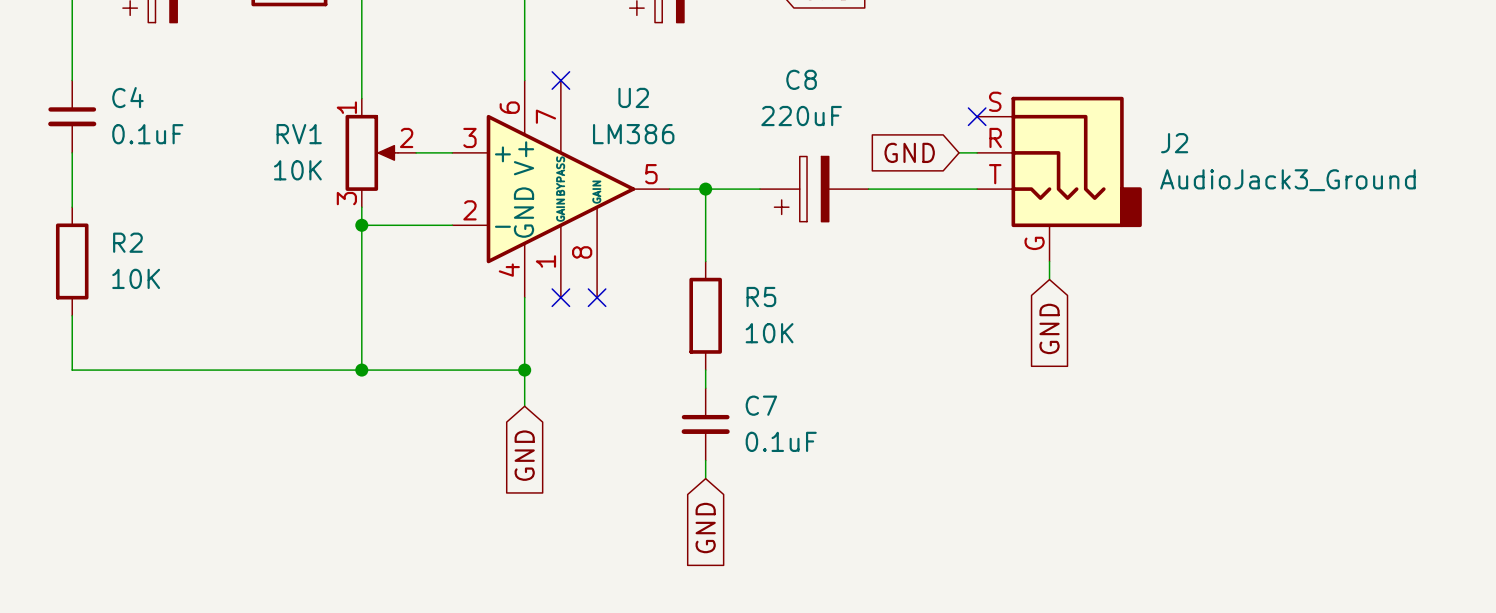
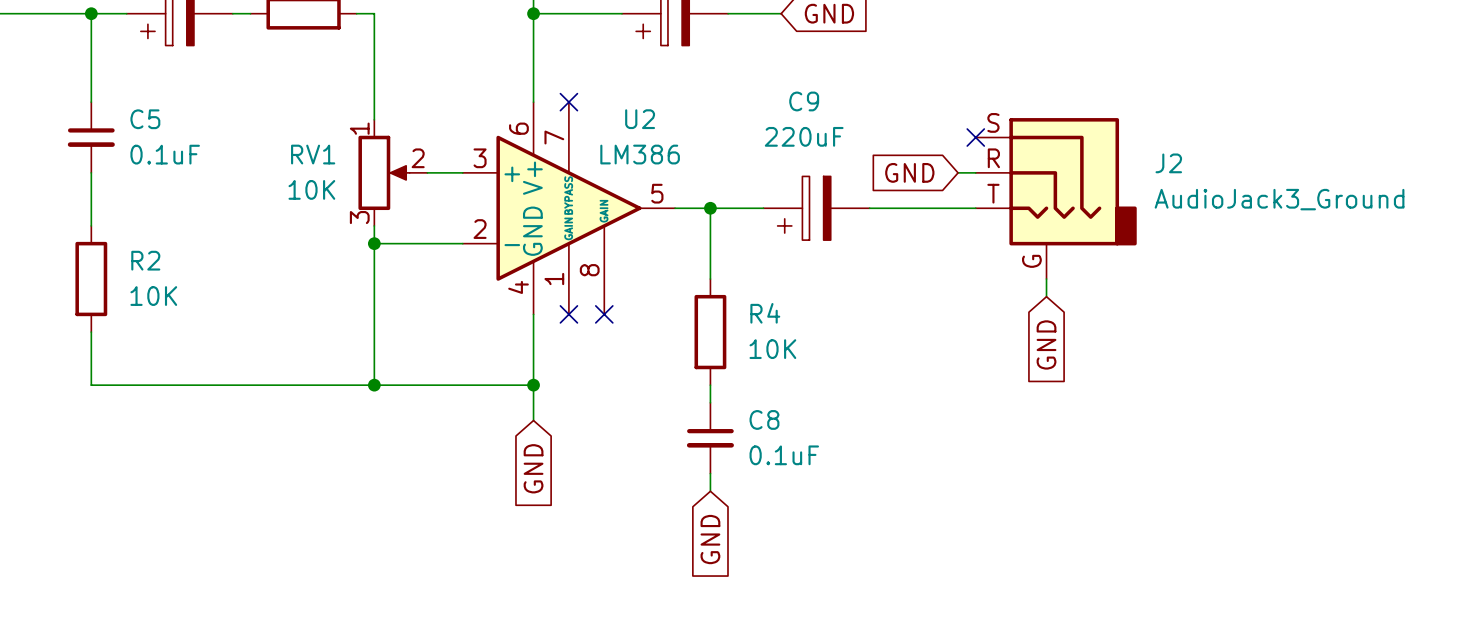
C8 name: C8 (801, 79) -> C9 (804, 101)
C4 name: C4 (127, 97) -> C5 (145, 119)
R5 name: R5 (761, 297) -> R4 (765, 313)
C7 name: C7 (761, 405) -> C8 (764, 419)

